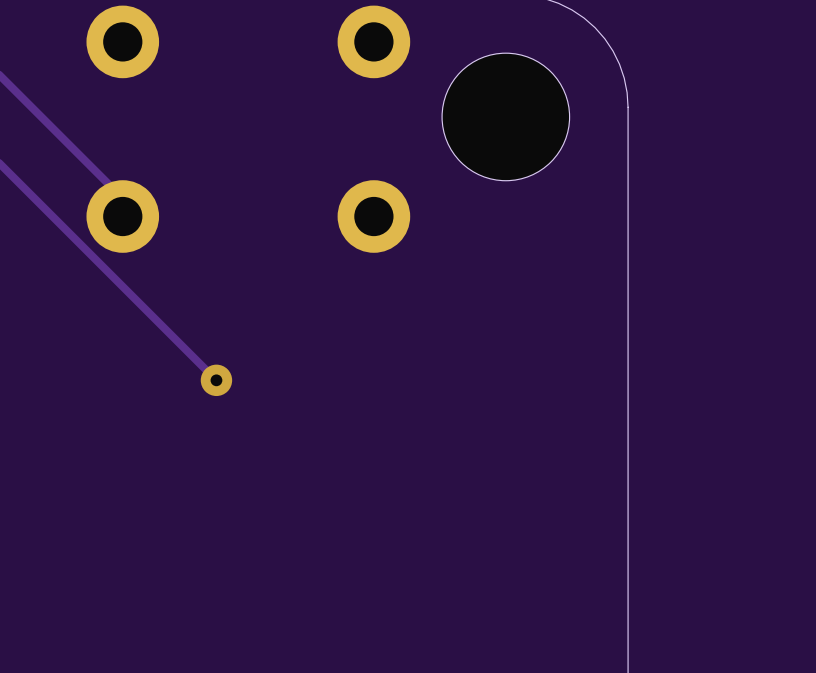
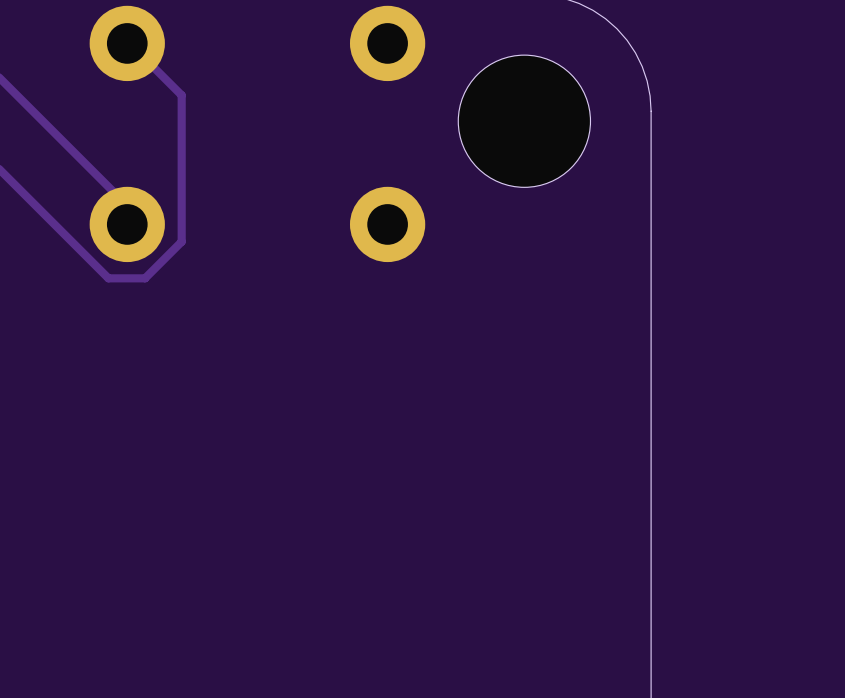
track: (104, 268) (216, 380) -> (108, 278) (145, 278) (181, 241) (181, 95) (132, 46) (127, 43)
via: (216, 380) -> none

